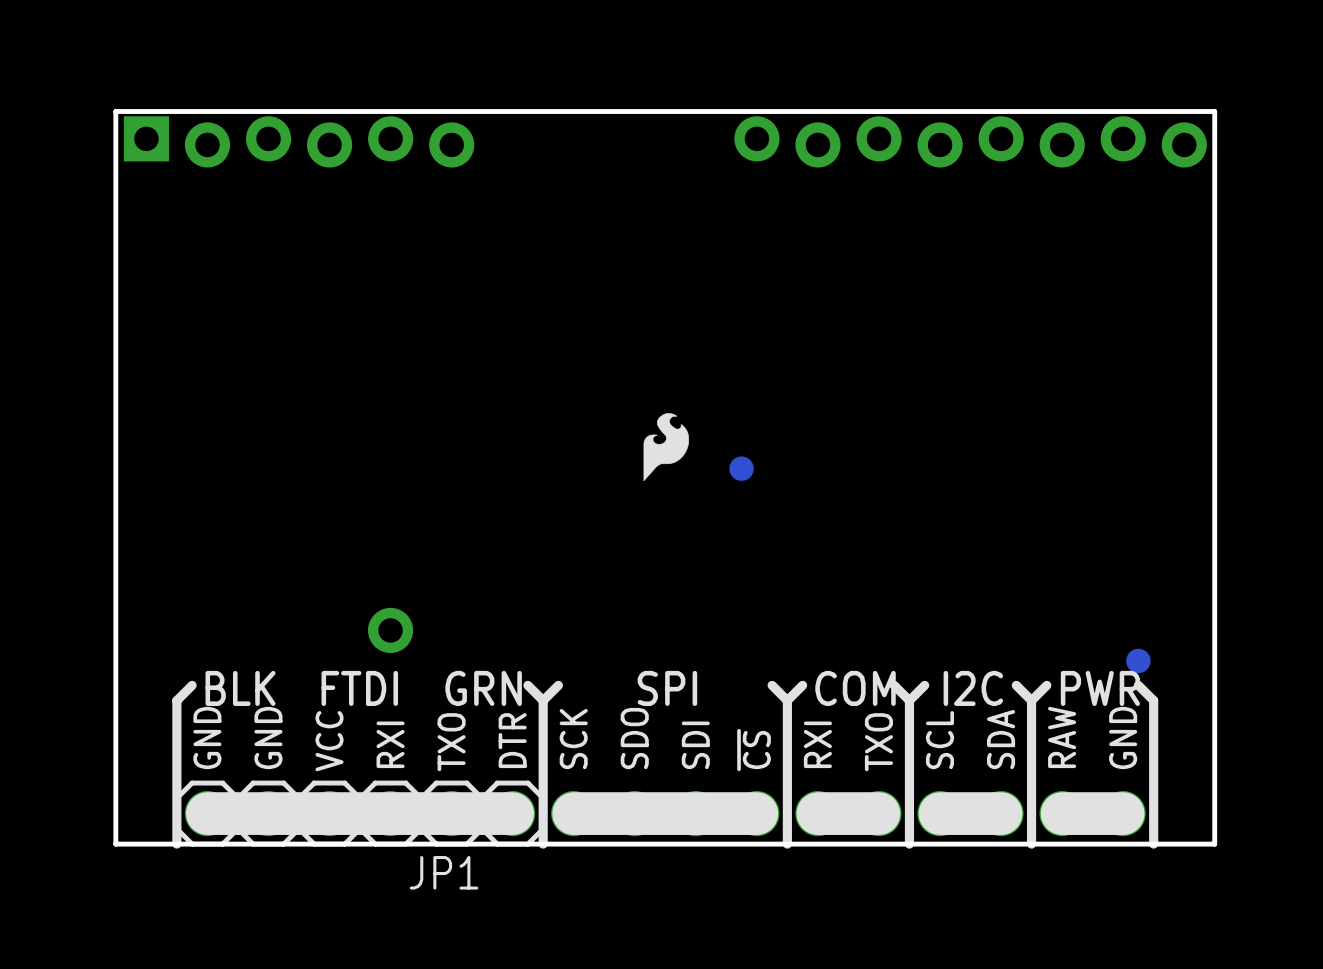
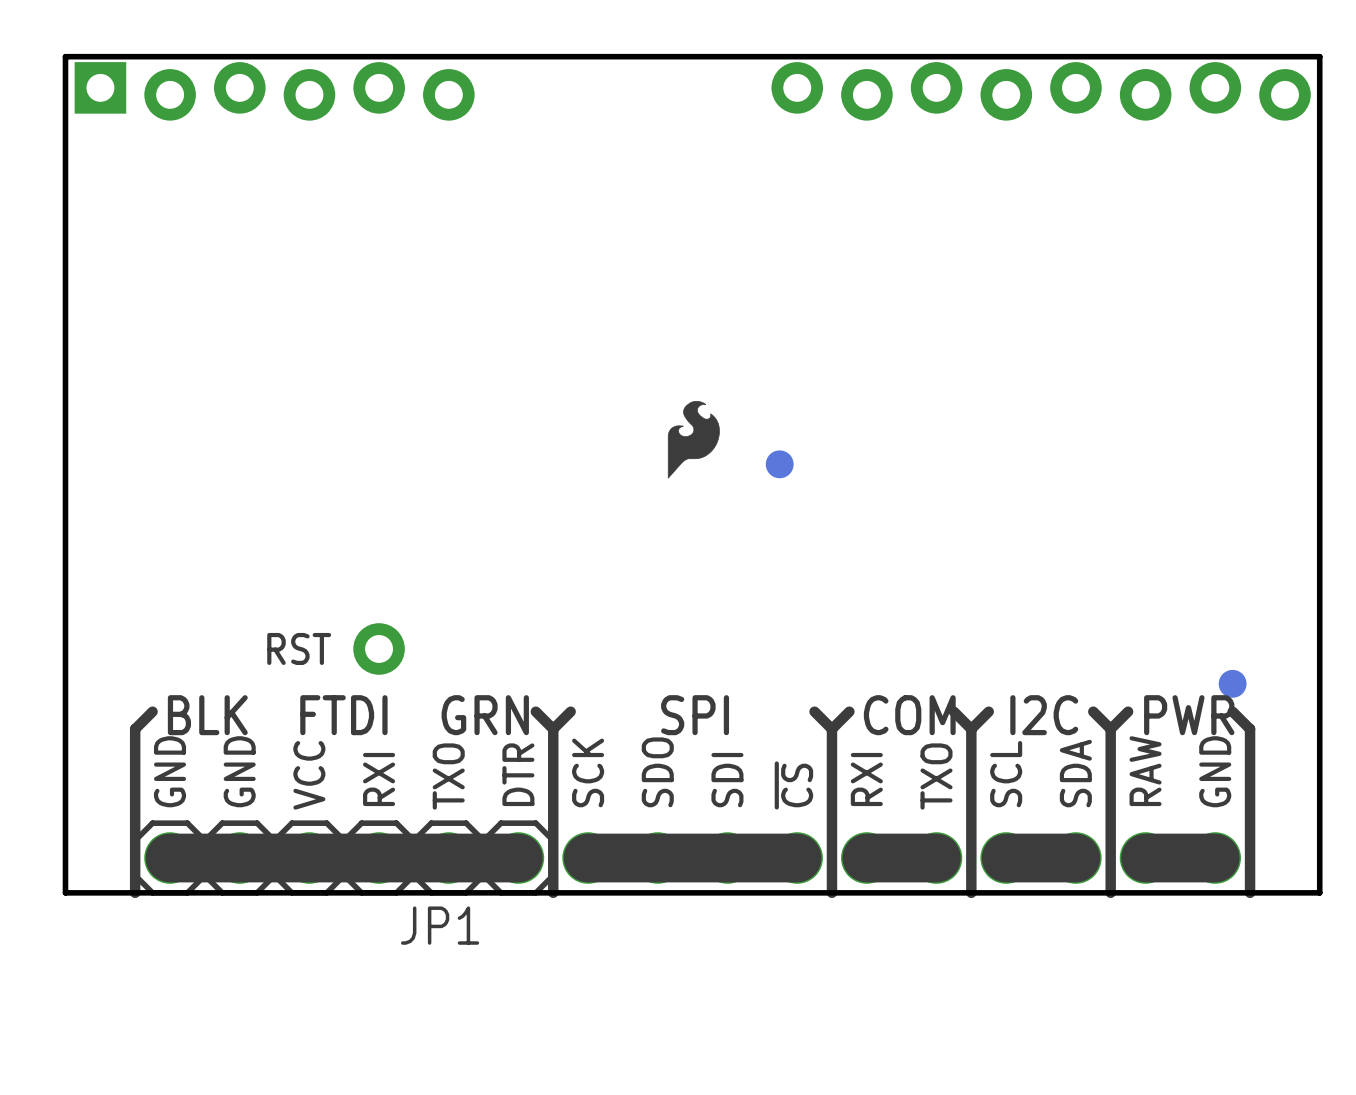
text: none -> RST (299, 648)

